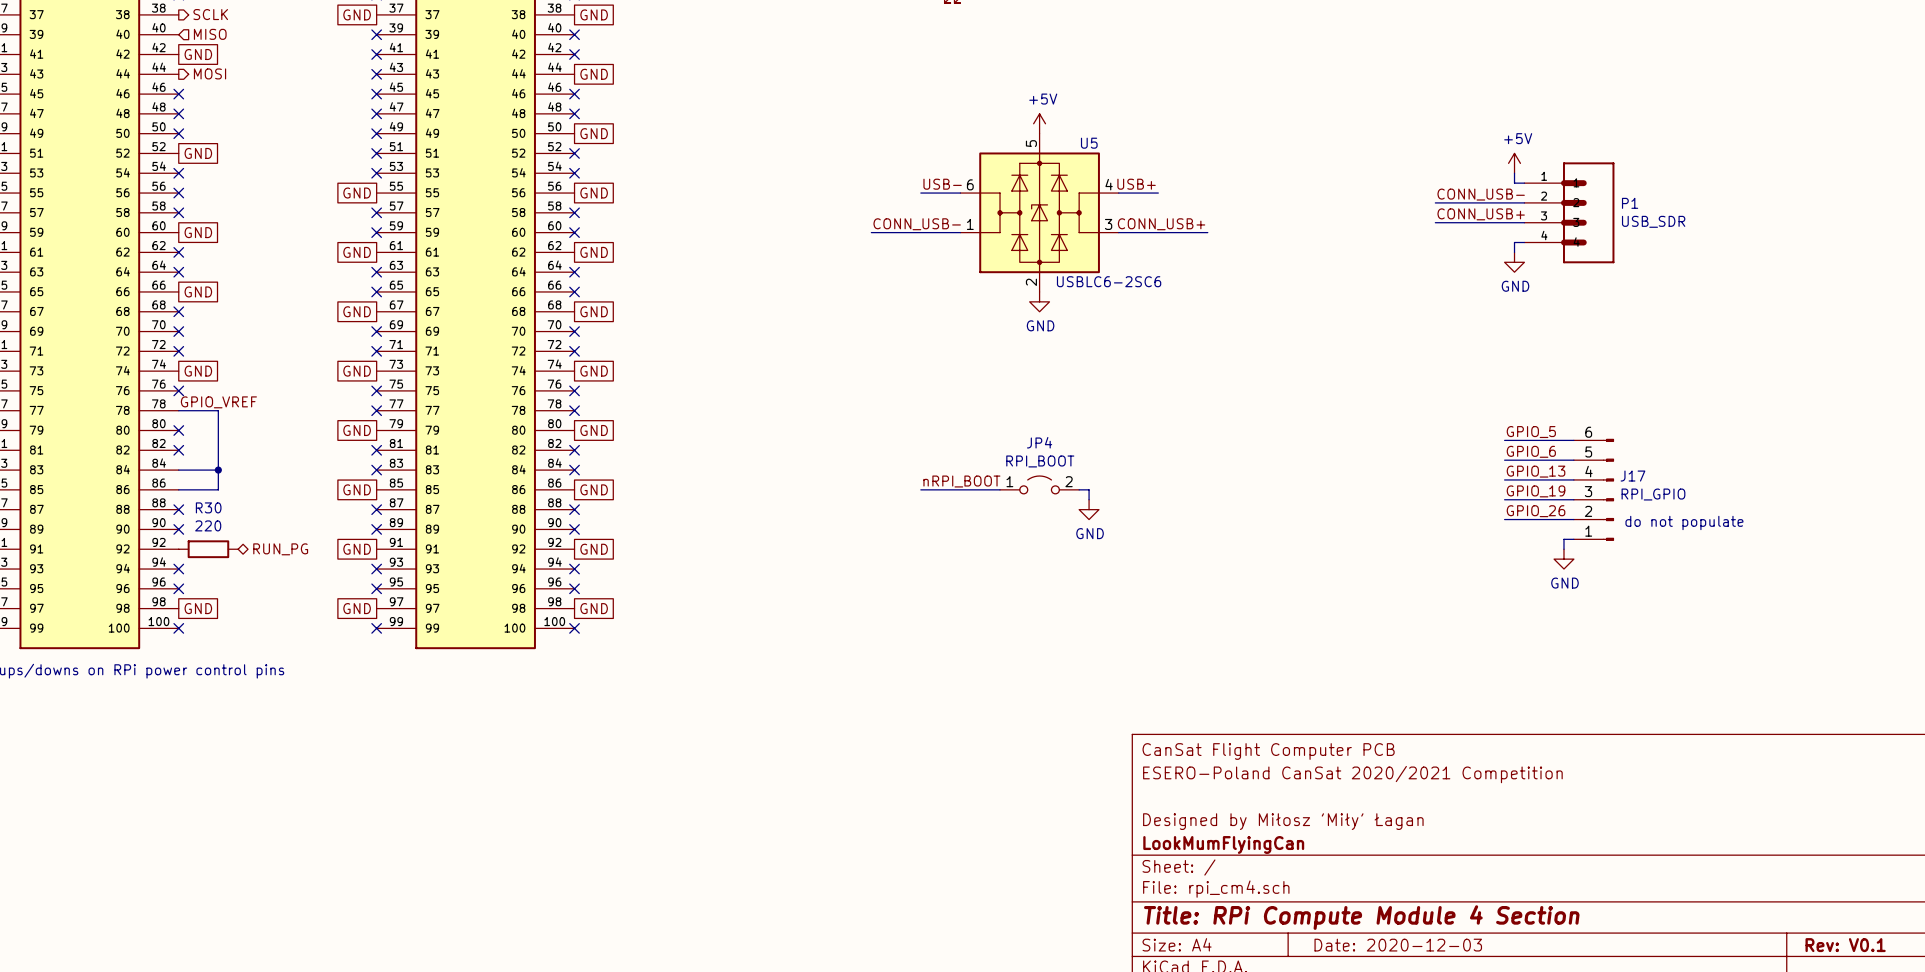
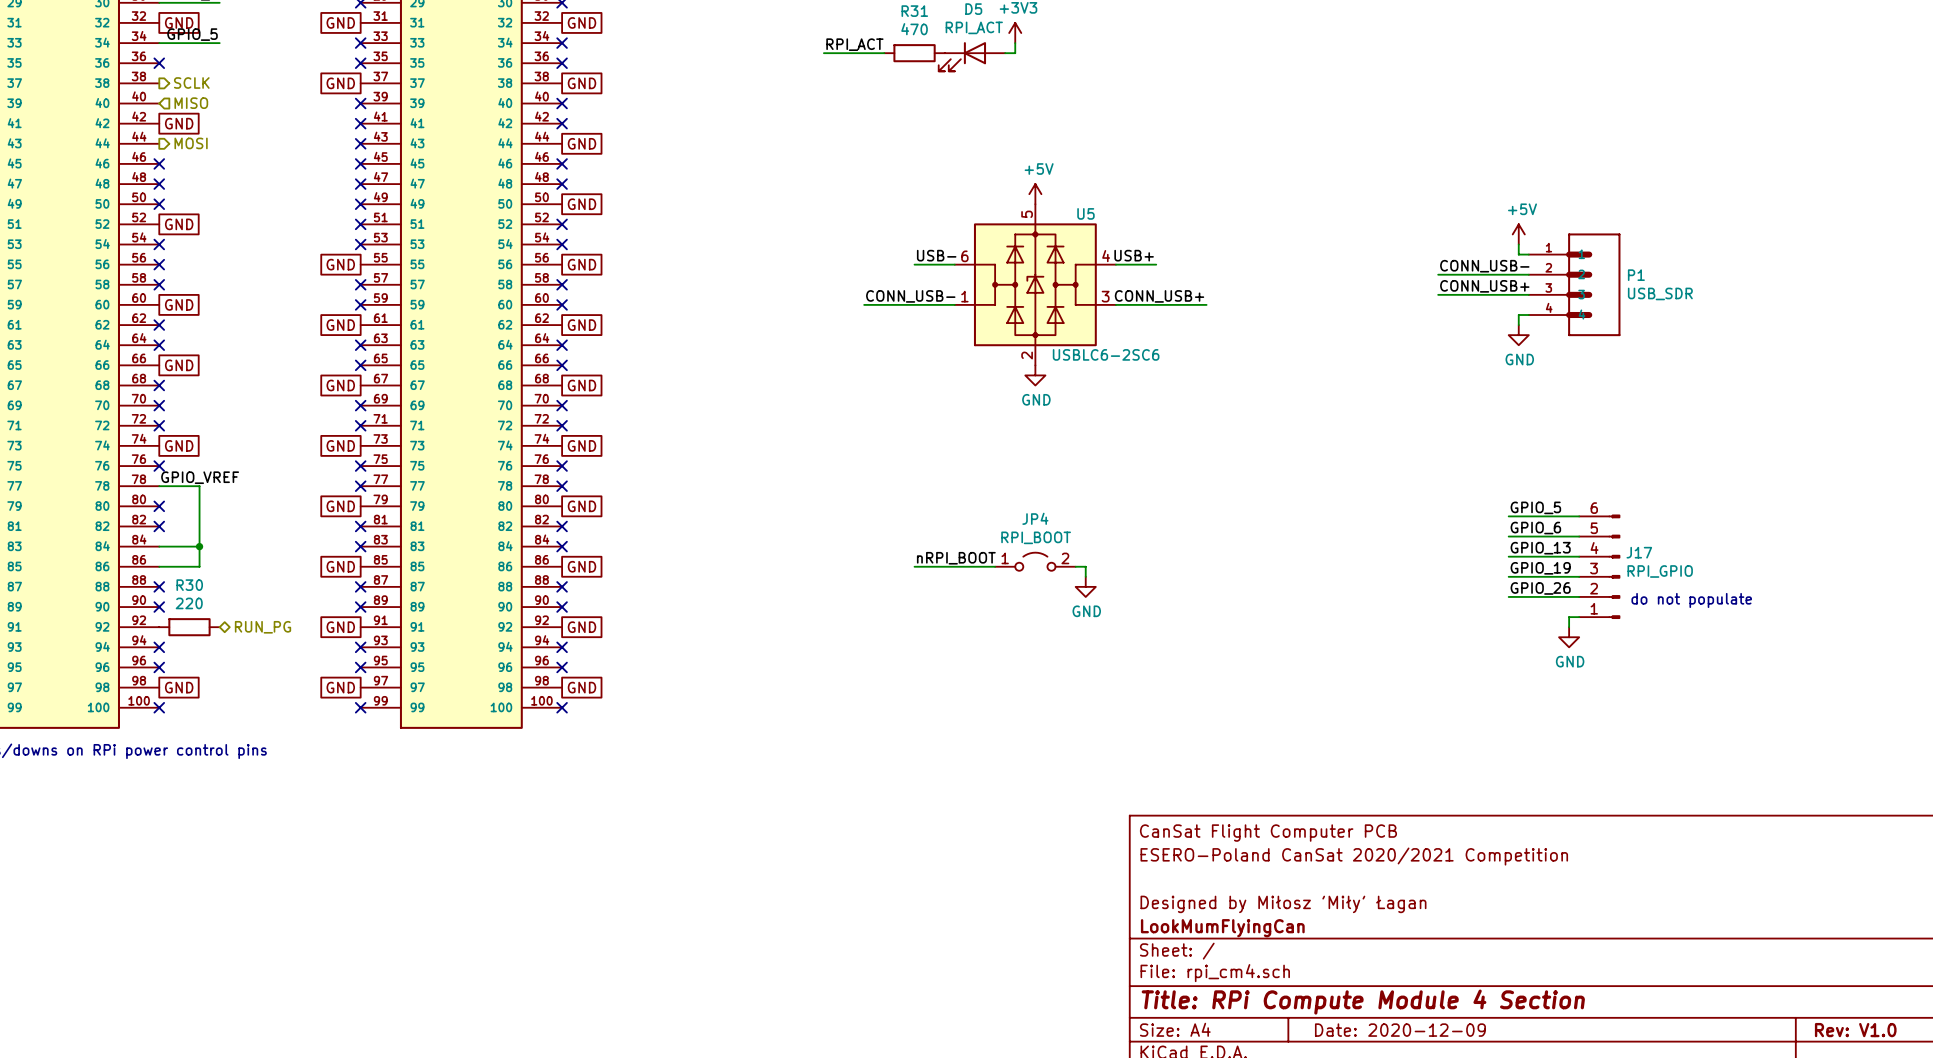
title block: Date: 2020-12-03 (1398, 945) -> Date: 2020-12-09 (1400, 1030)
title block: Rev: V0.1 (1845, 945) -> Rev: V1.0 (1855, 1030)

